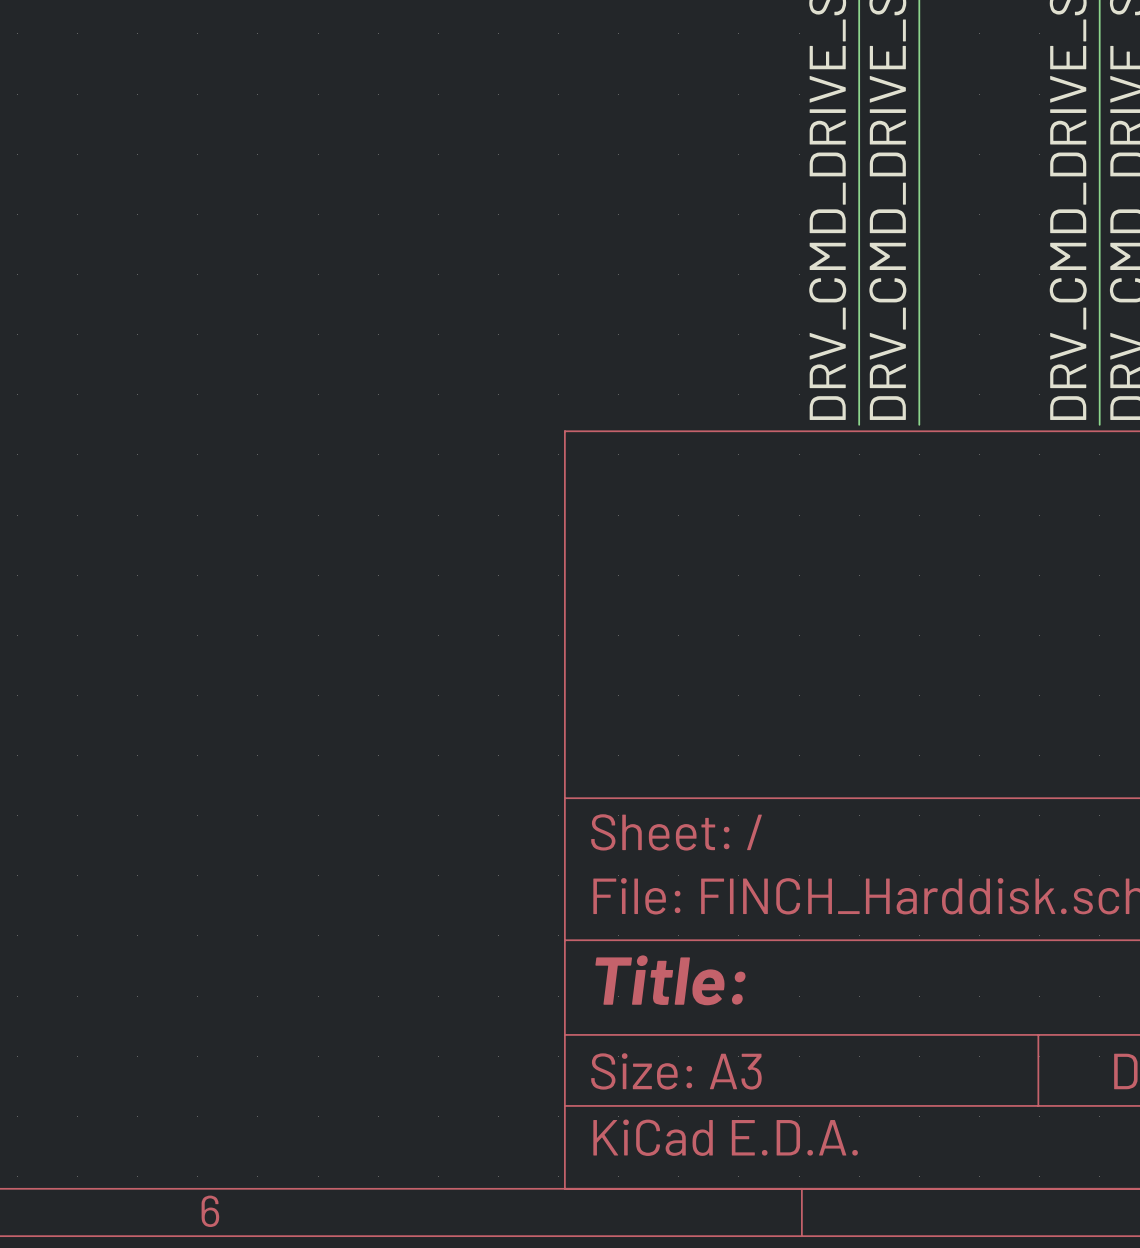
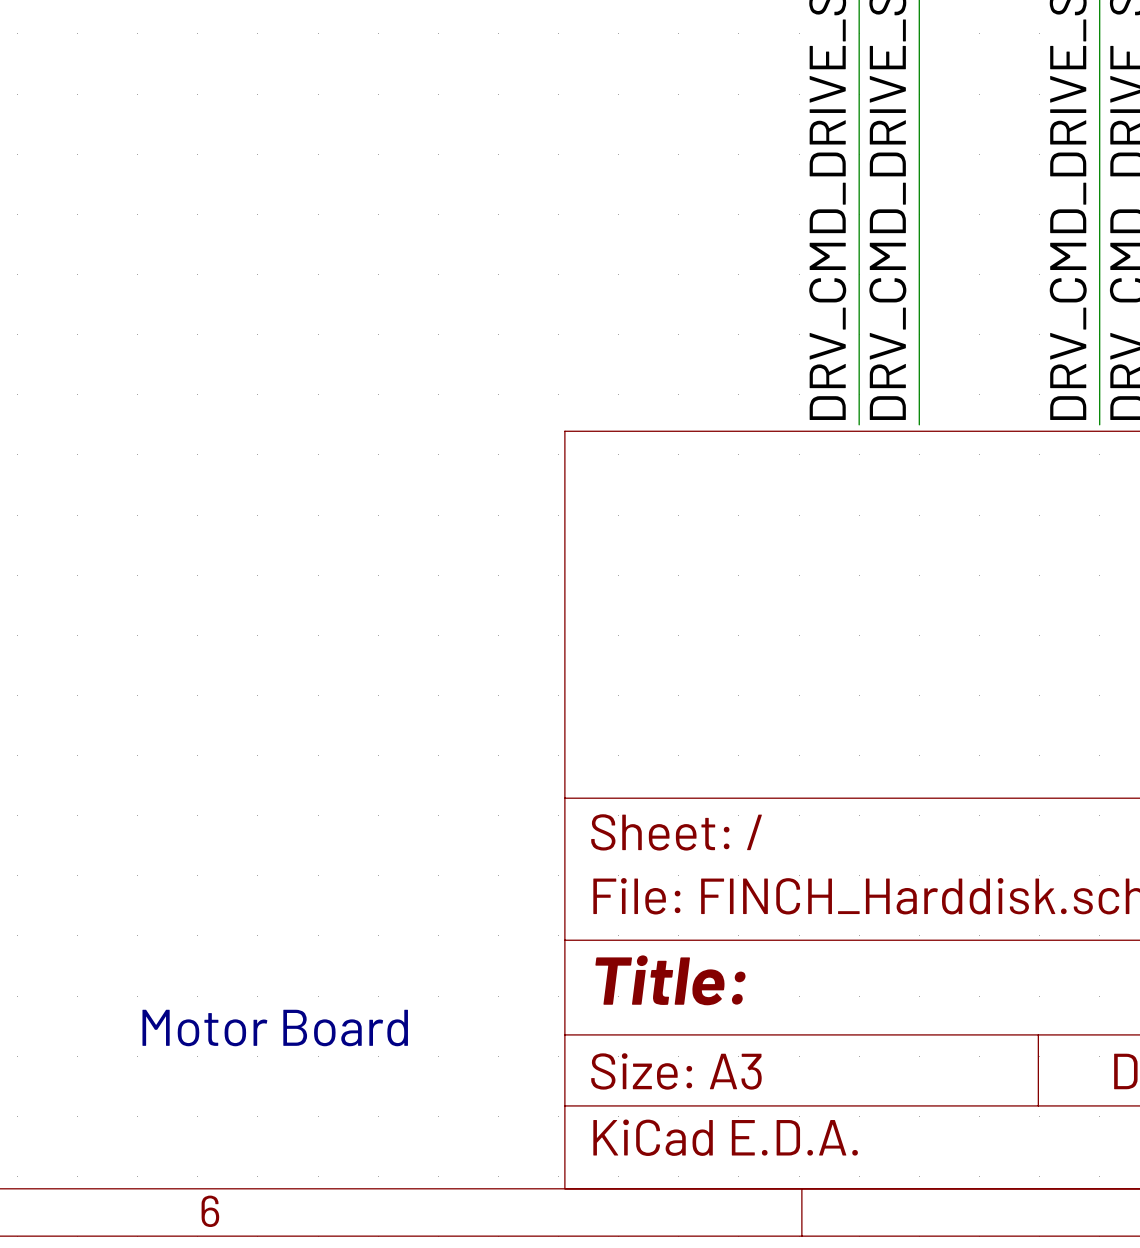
text: none -> Motor Board (275, 1028)

